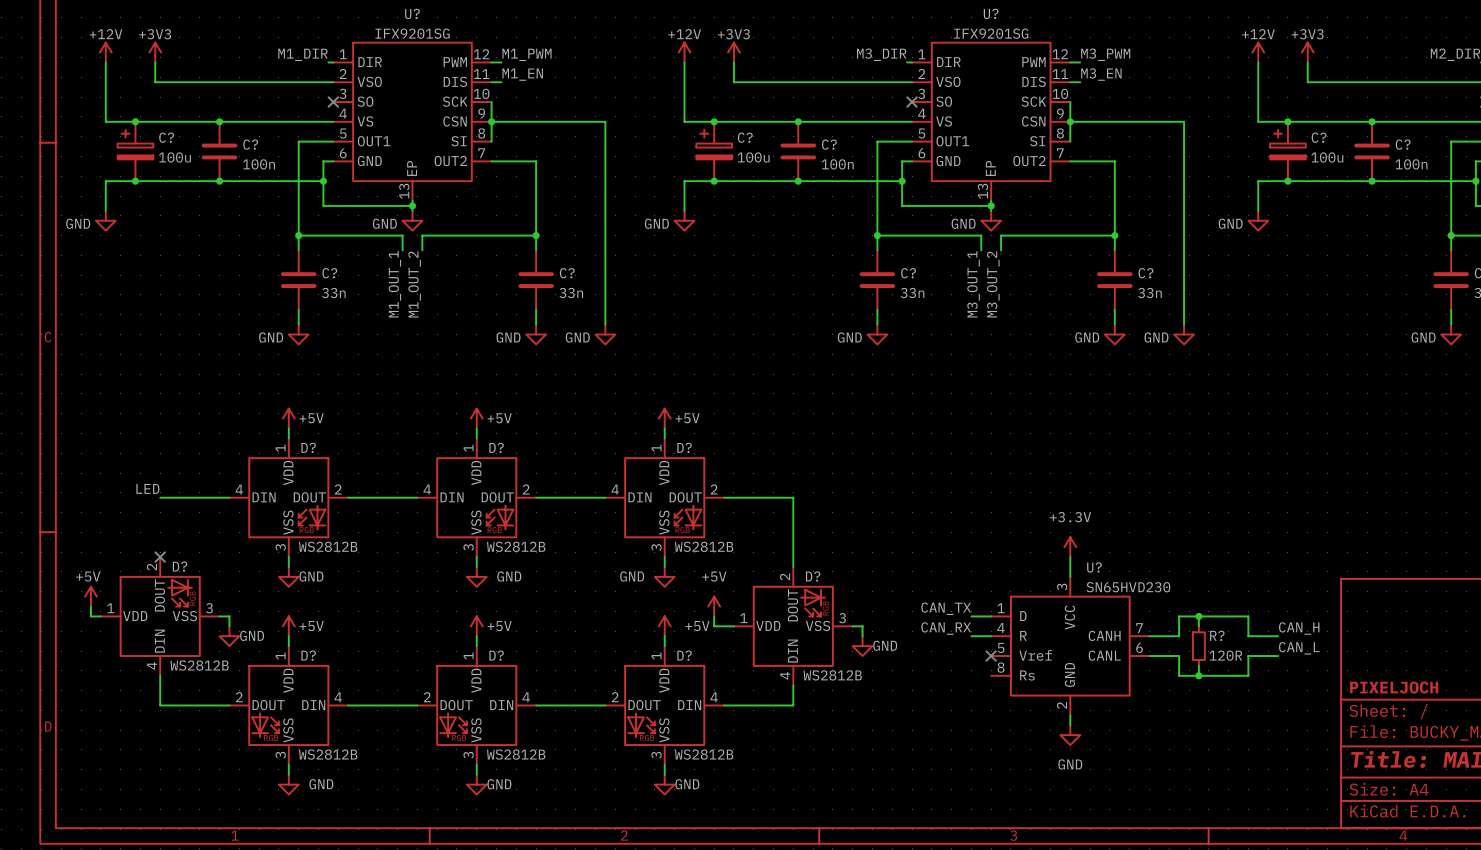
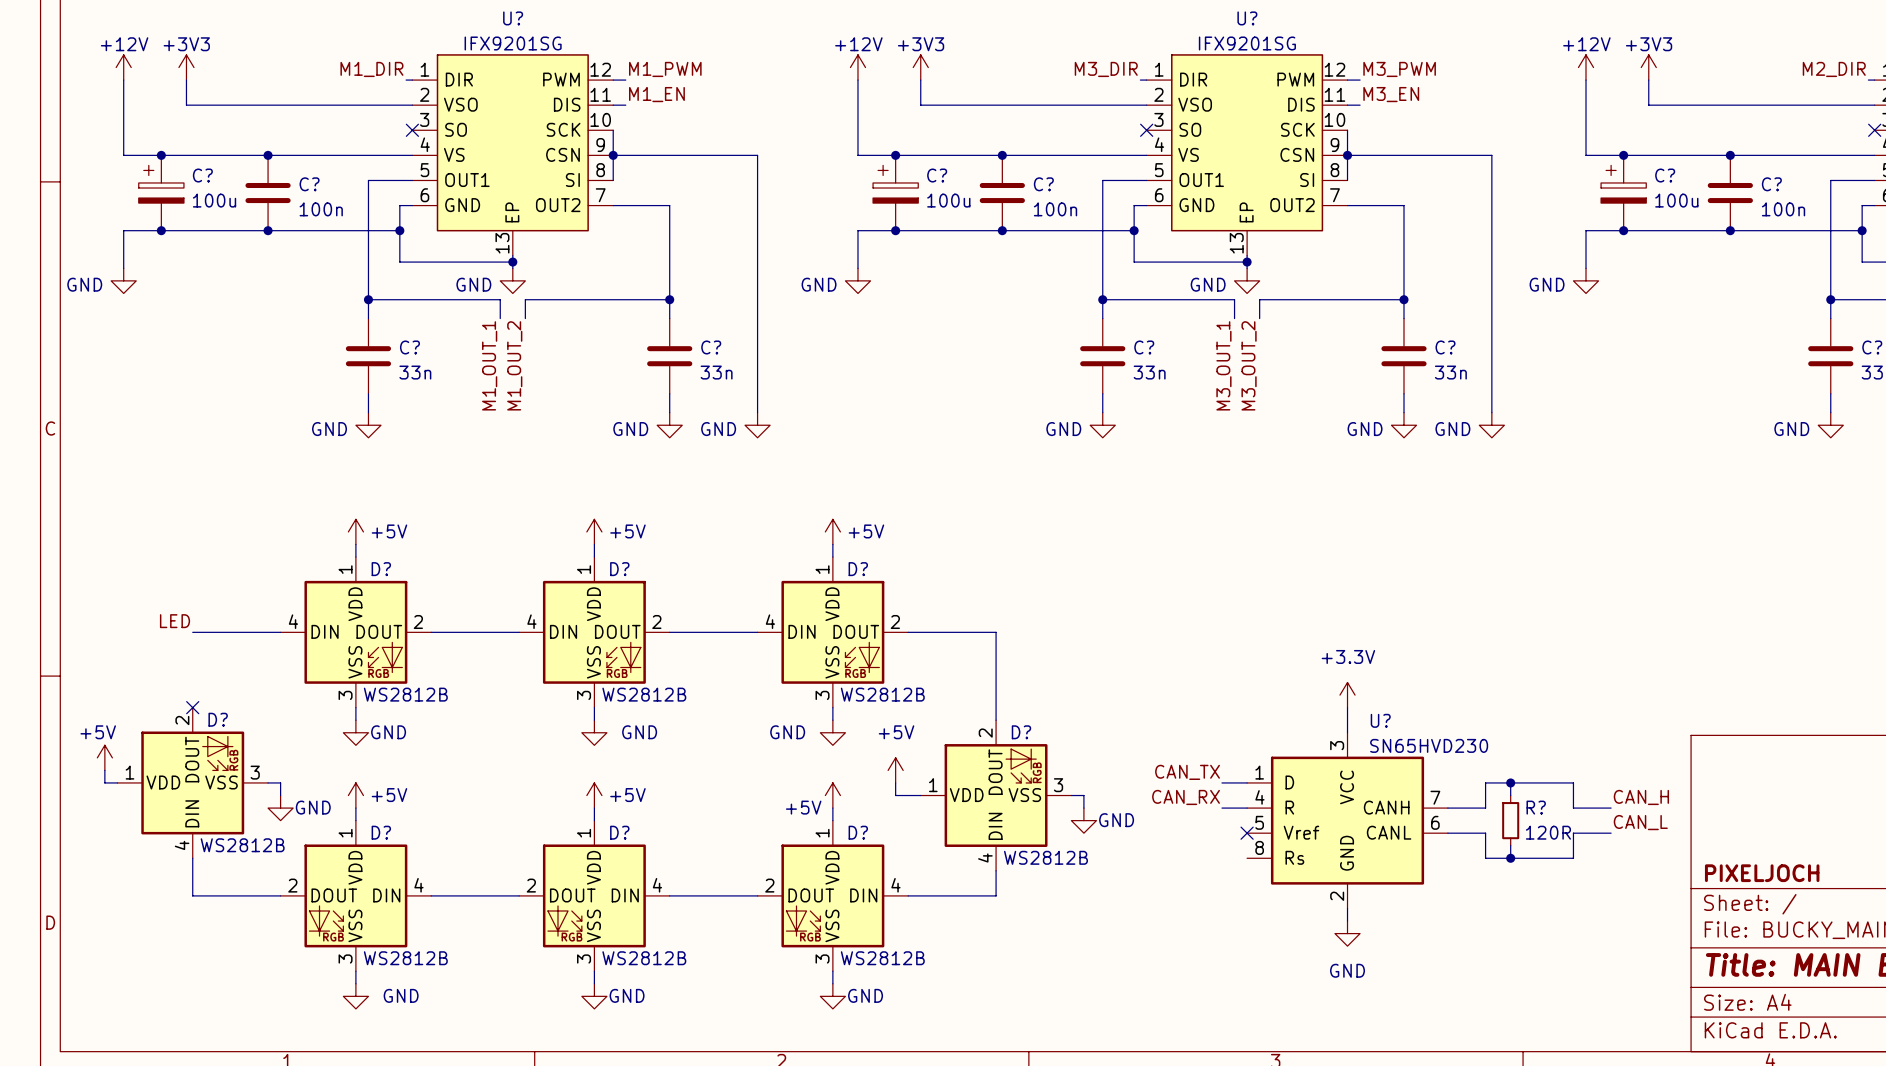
power symbol text position: +5V (697, 626) -> +5V (803, 807)

